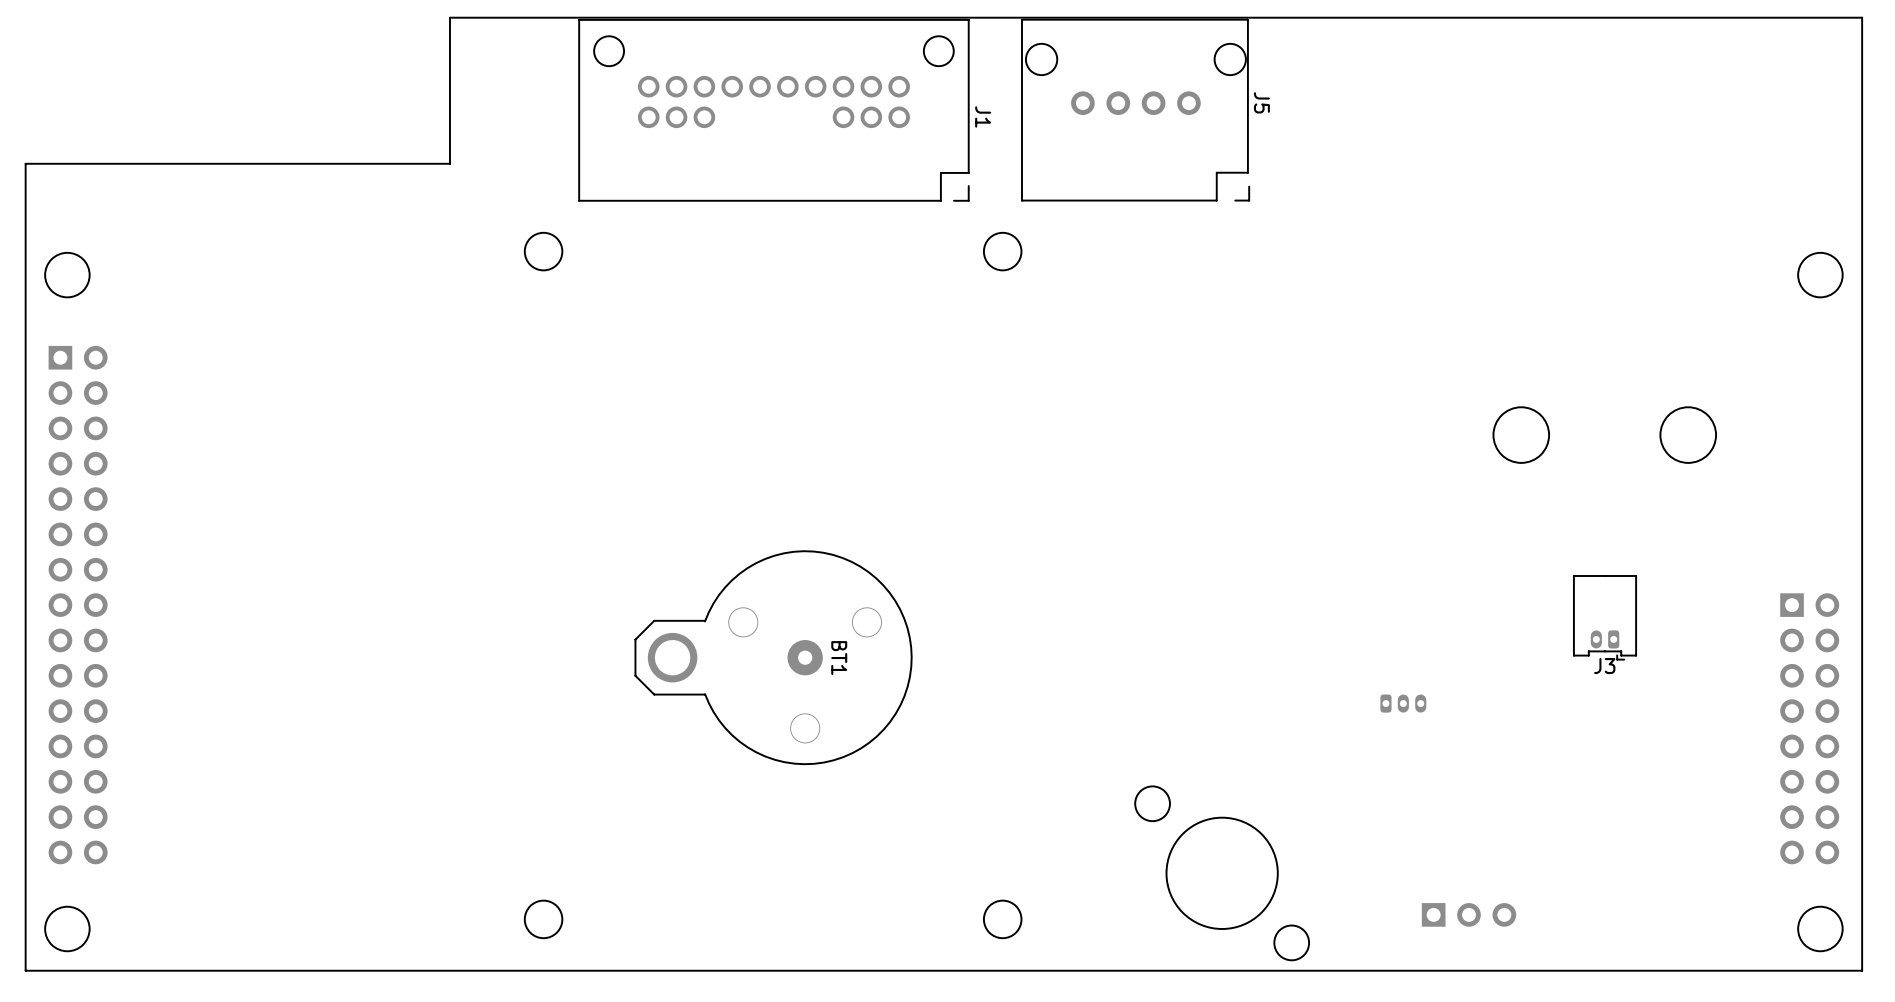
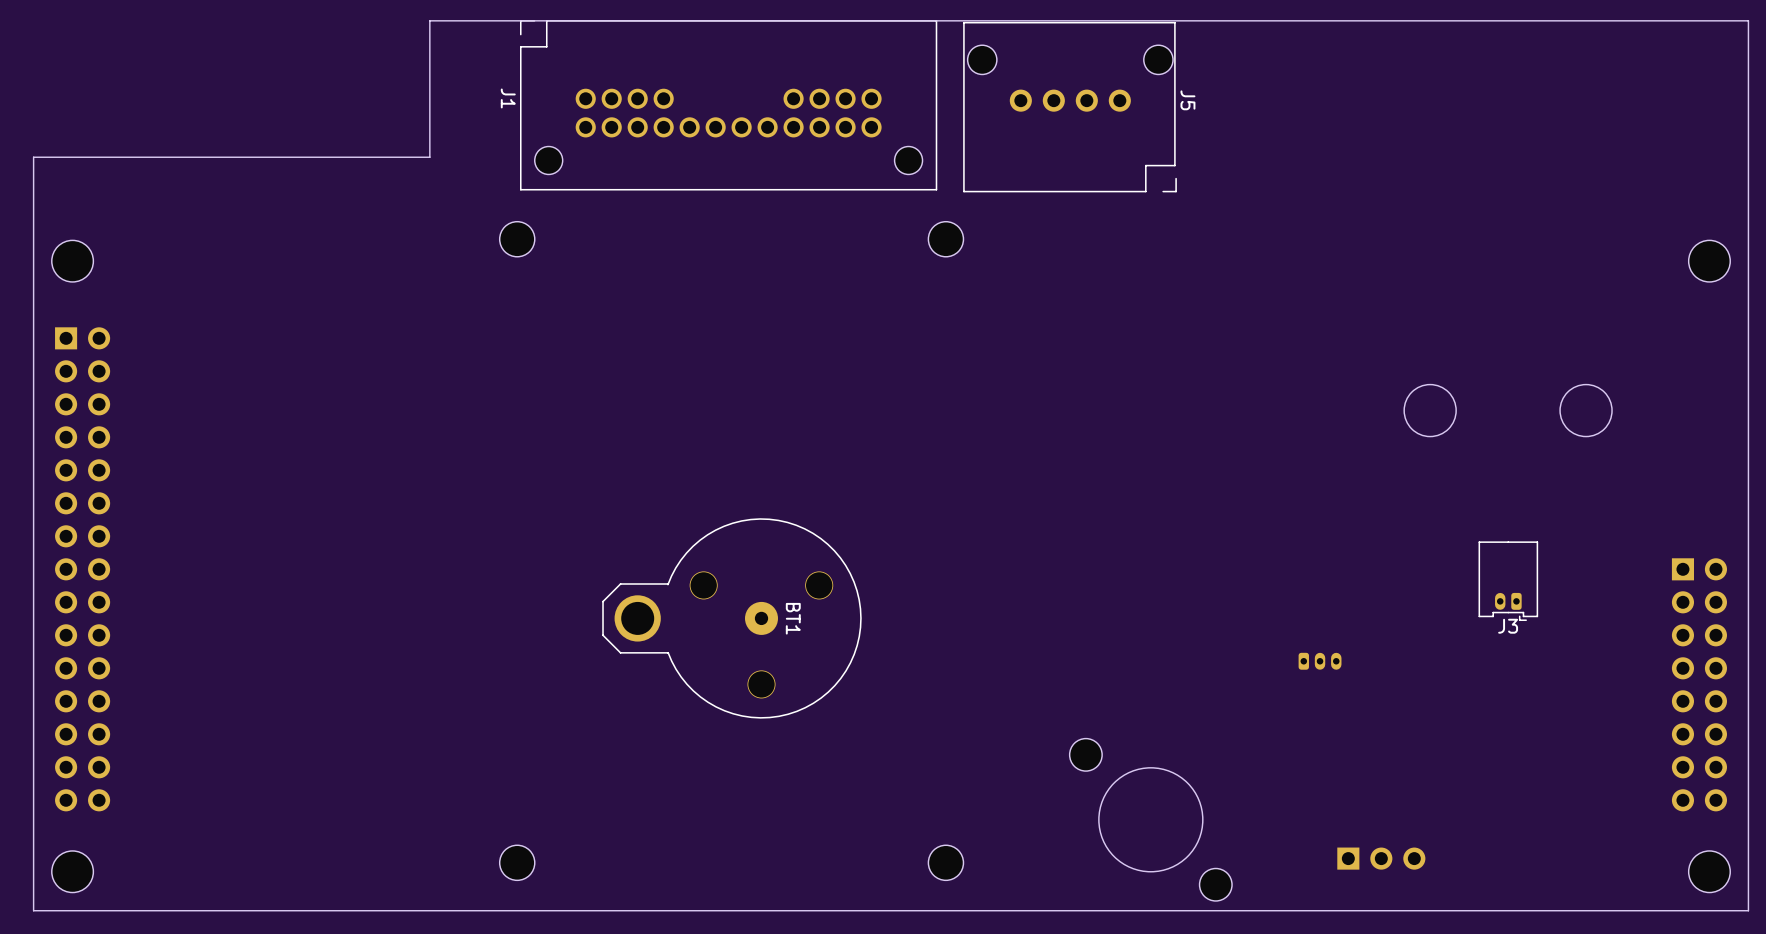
J1 footprint: [578, 19, 970, 202] -> [519, 20, 938, 191]
J1 name position: J1 (983, 116) -> J1 (508, 98)

